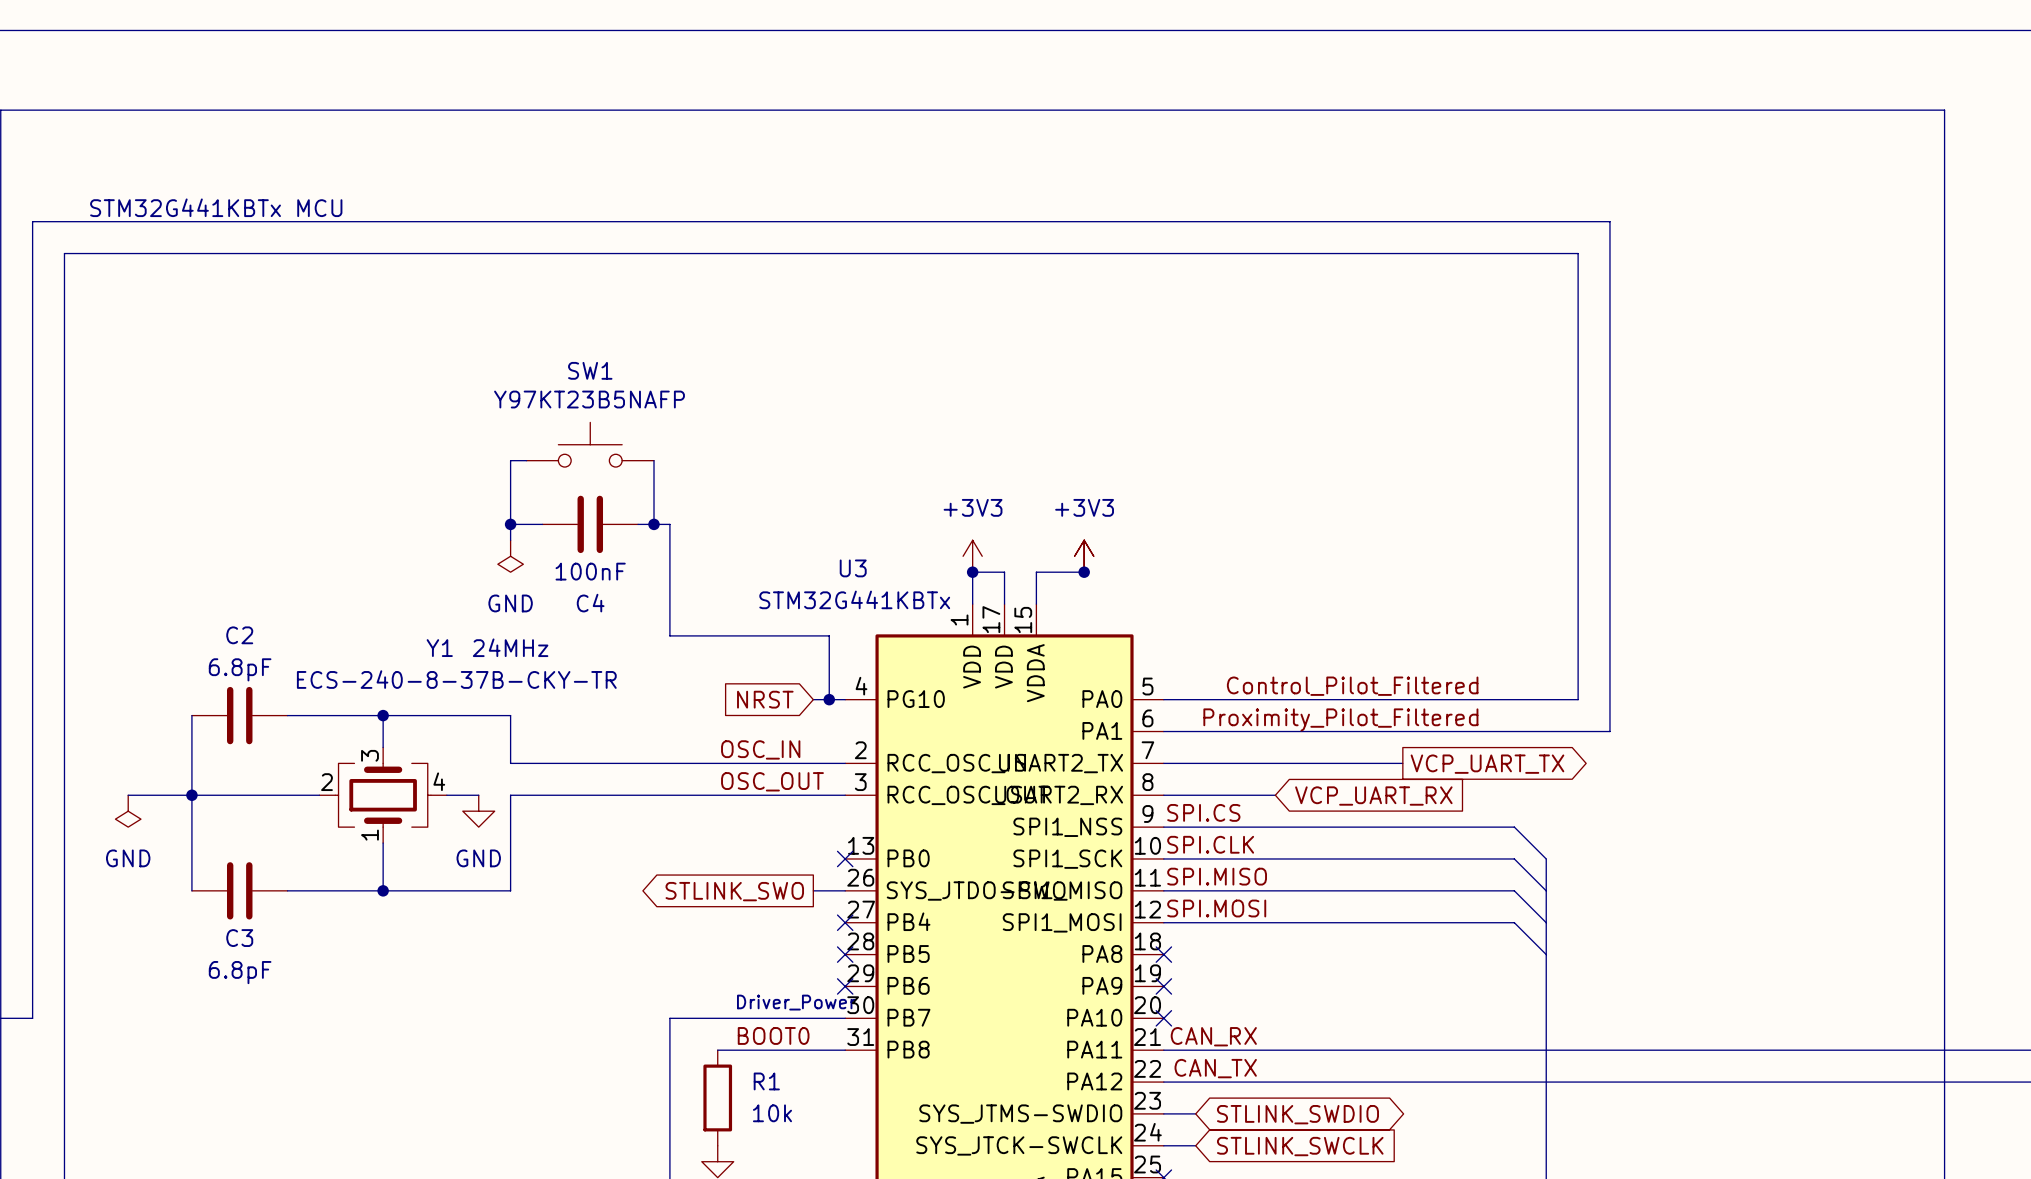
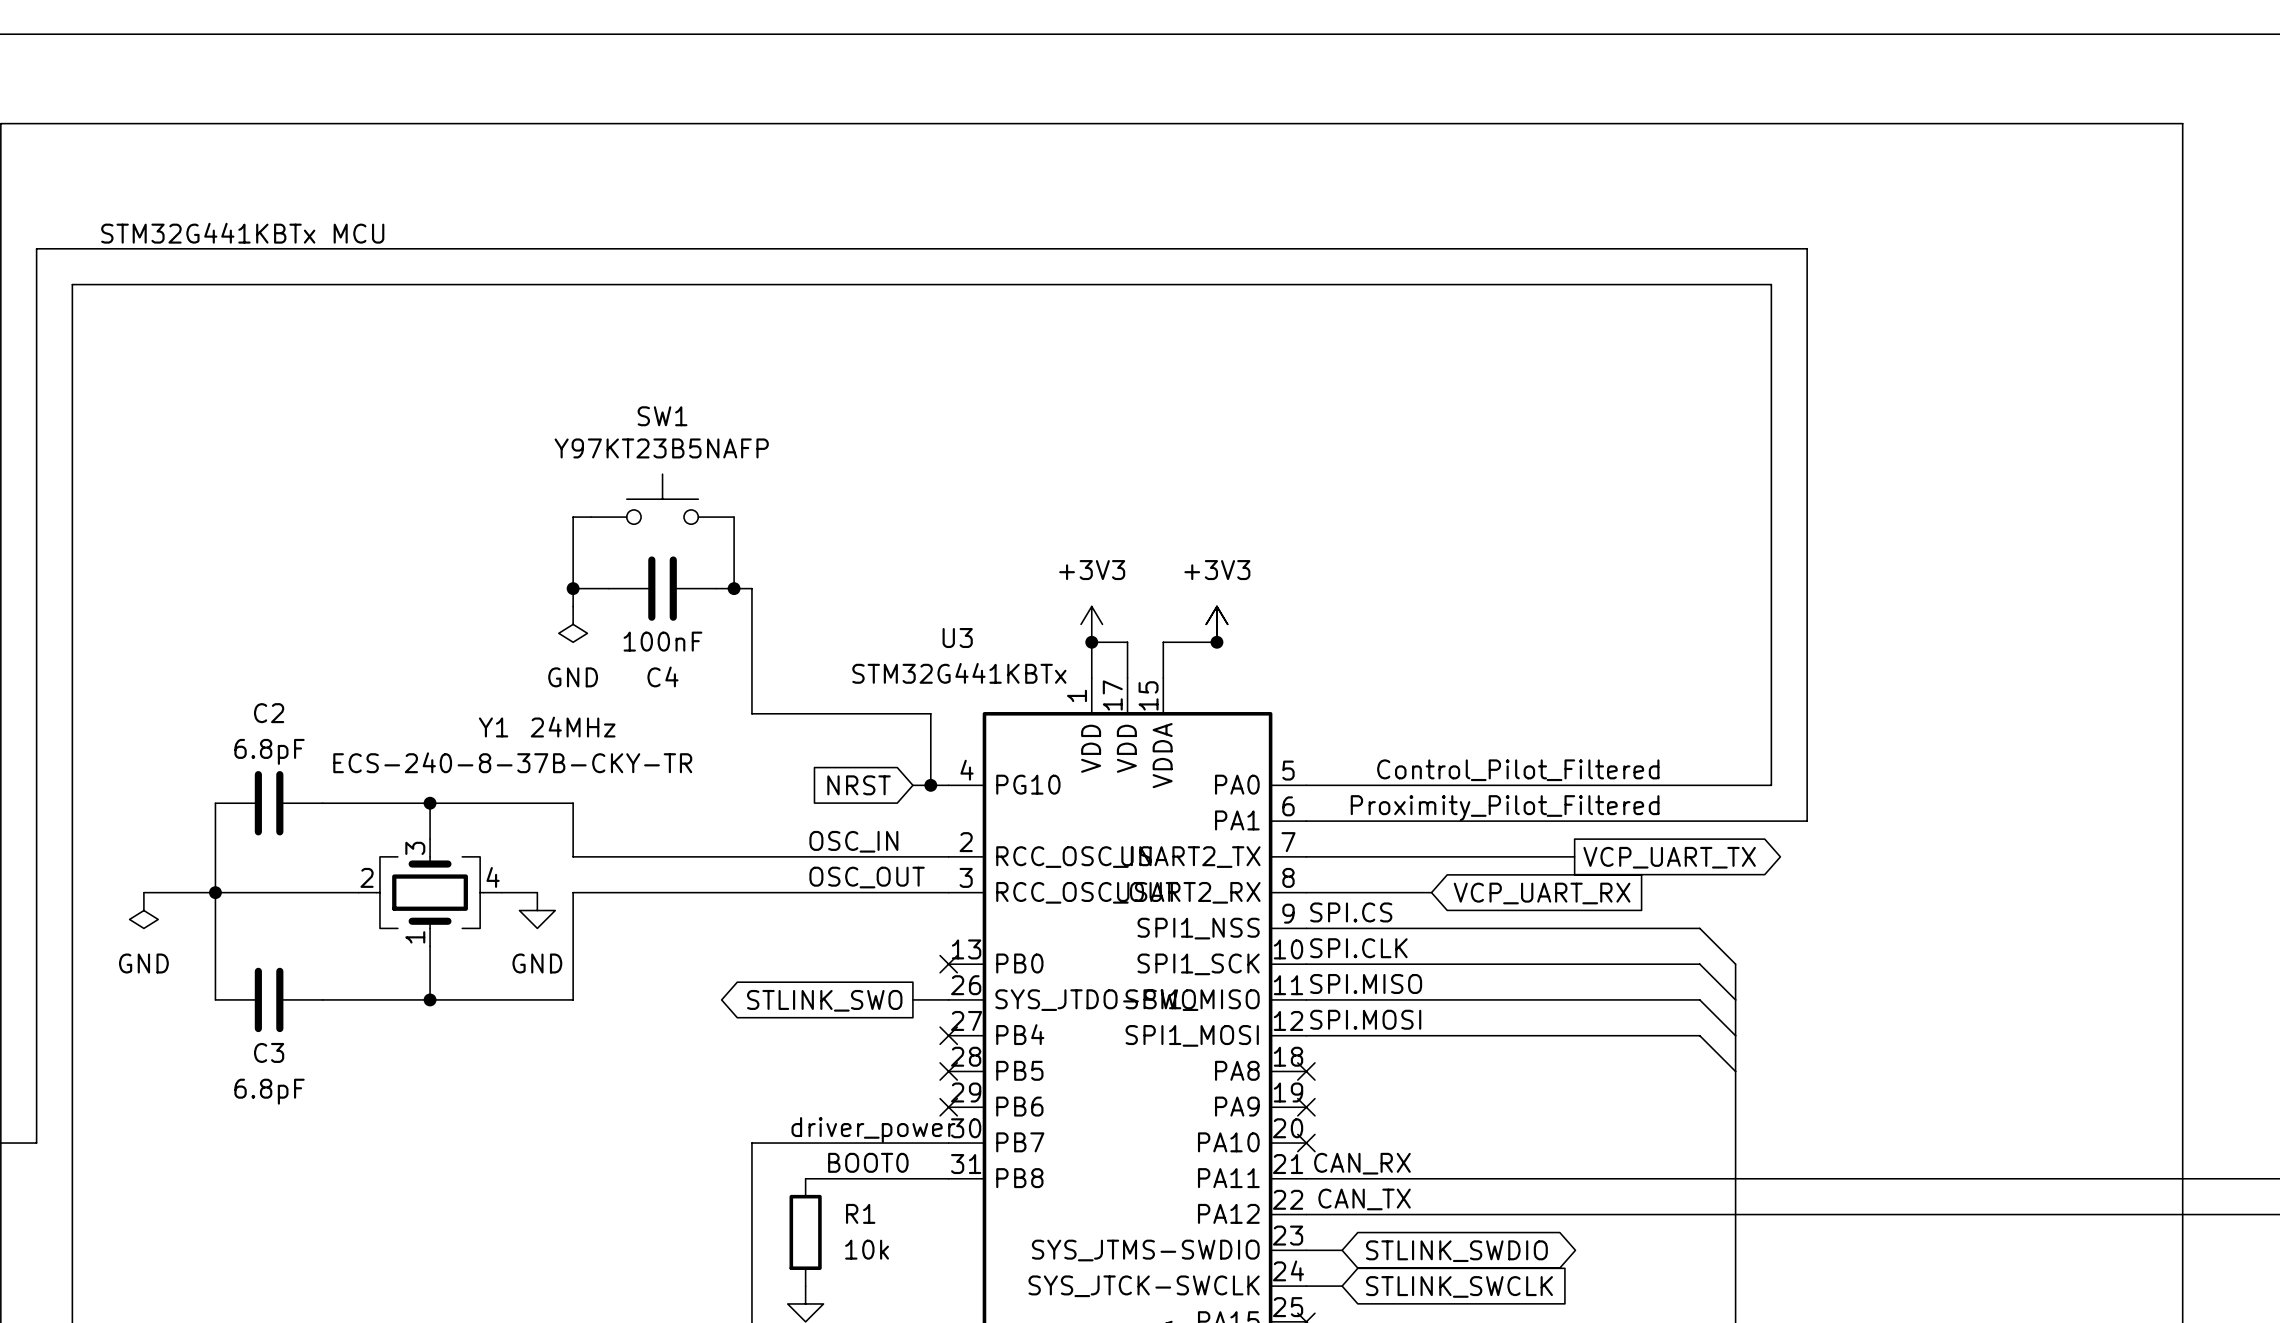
text: Driver_Power (796, 1002) -> none
label: none -> driver_power (873, 1130)

